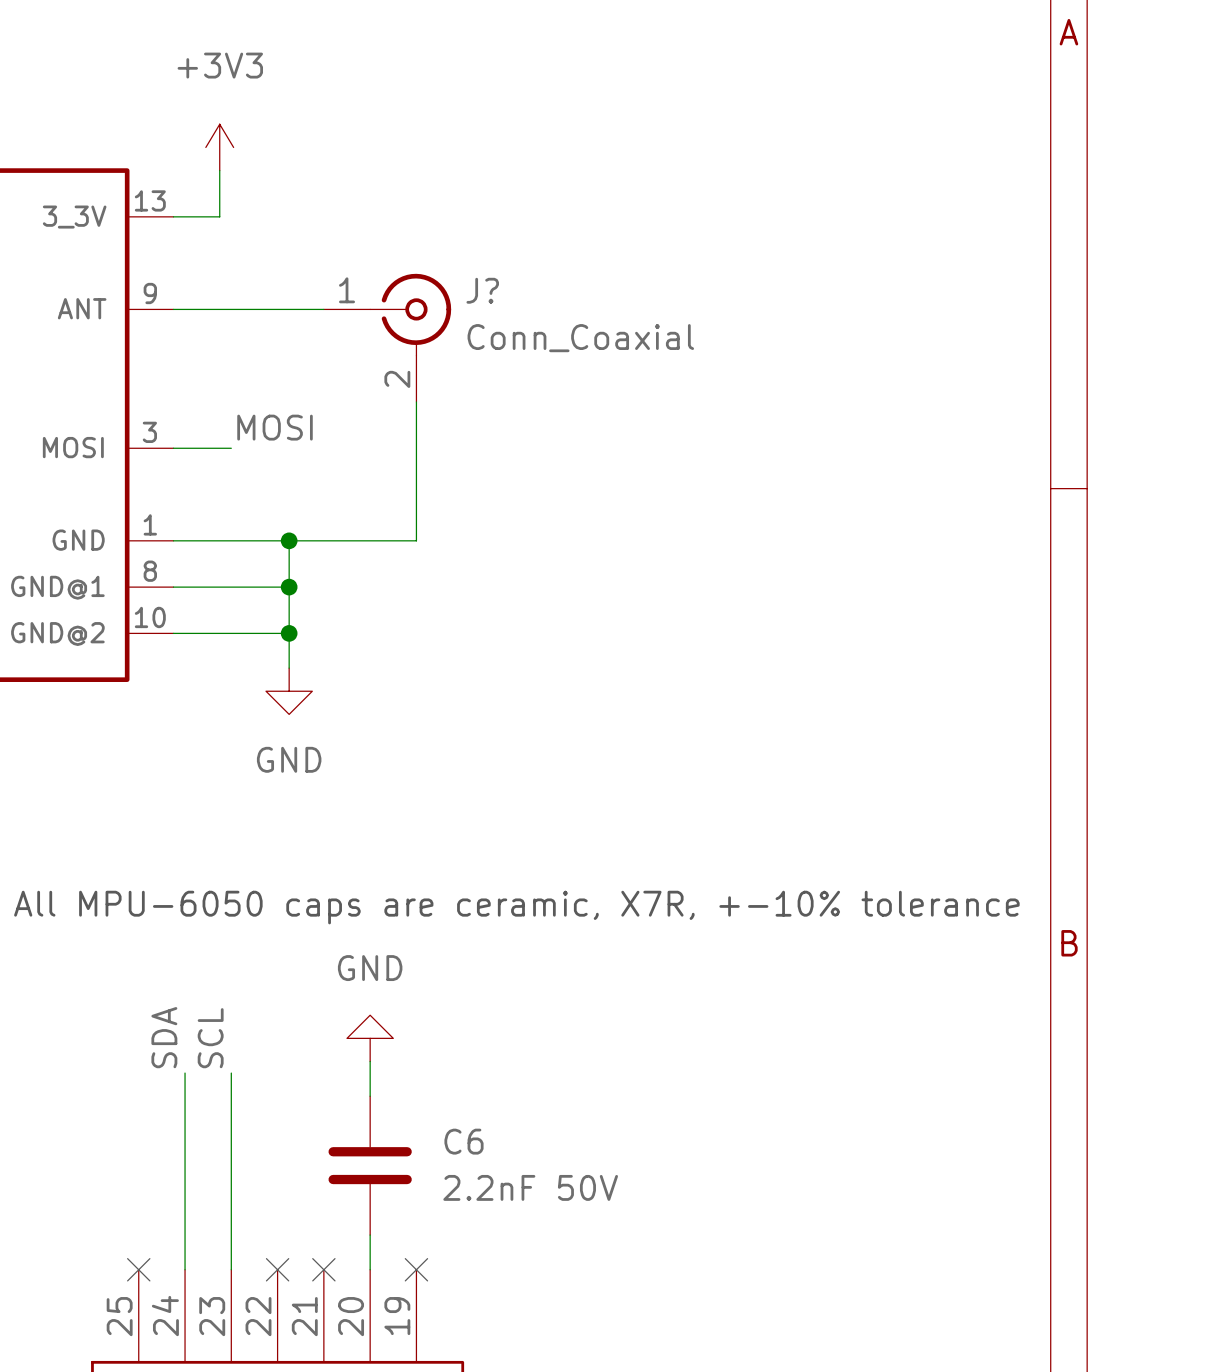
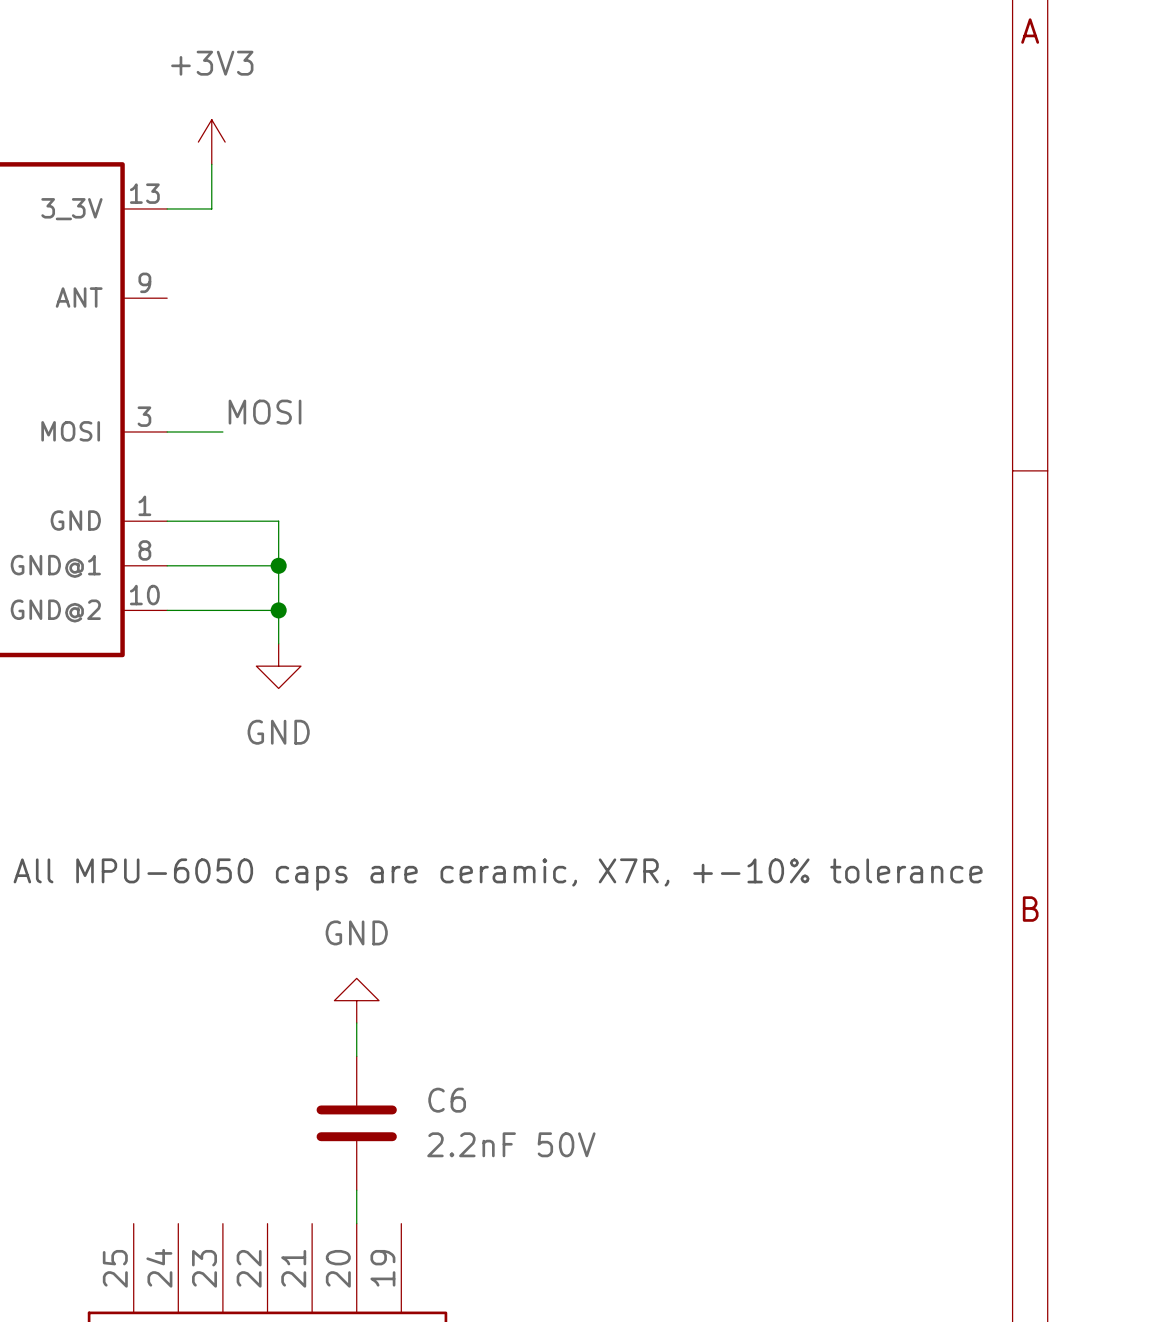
wire: (173, 309) (323, 309) -> none
J?: Conn_Coaxial (387, 337) -> none
wire: (416, 401) (416, 540) (289, 540) -> none
junction: (289, 540) -> none
label: SDA (164, 1037) -> none
label: SCL (210, 1038) -> none
wire: (185, 1073) (185, 1269) -> none
wire: (231, 1073) (231, 1269) -> none
no-connect mark: (138, 1269) -> none
no-connect mark: (277, 1269) -> none
no-connect mark: (323, 1269) -> none
no-connect mark: (416, 1269) -> none

